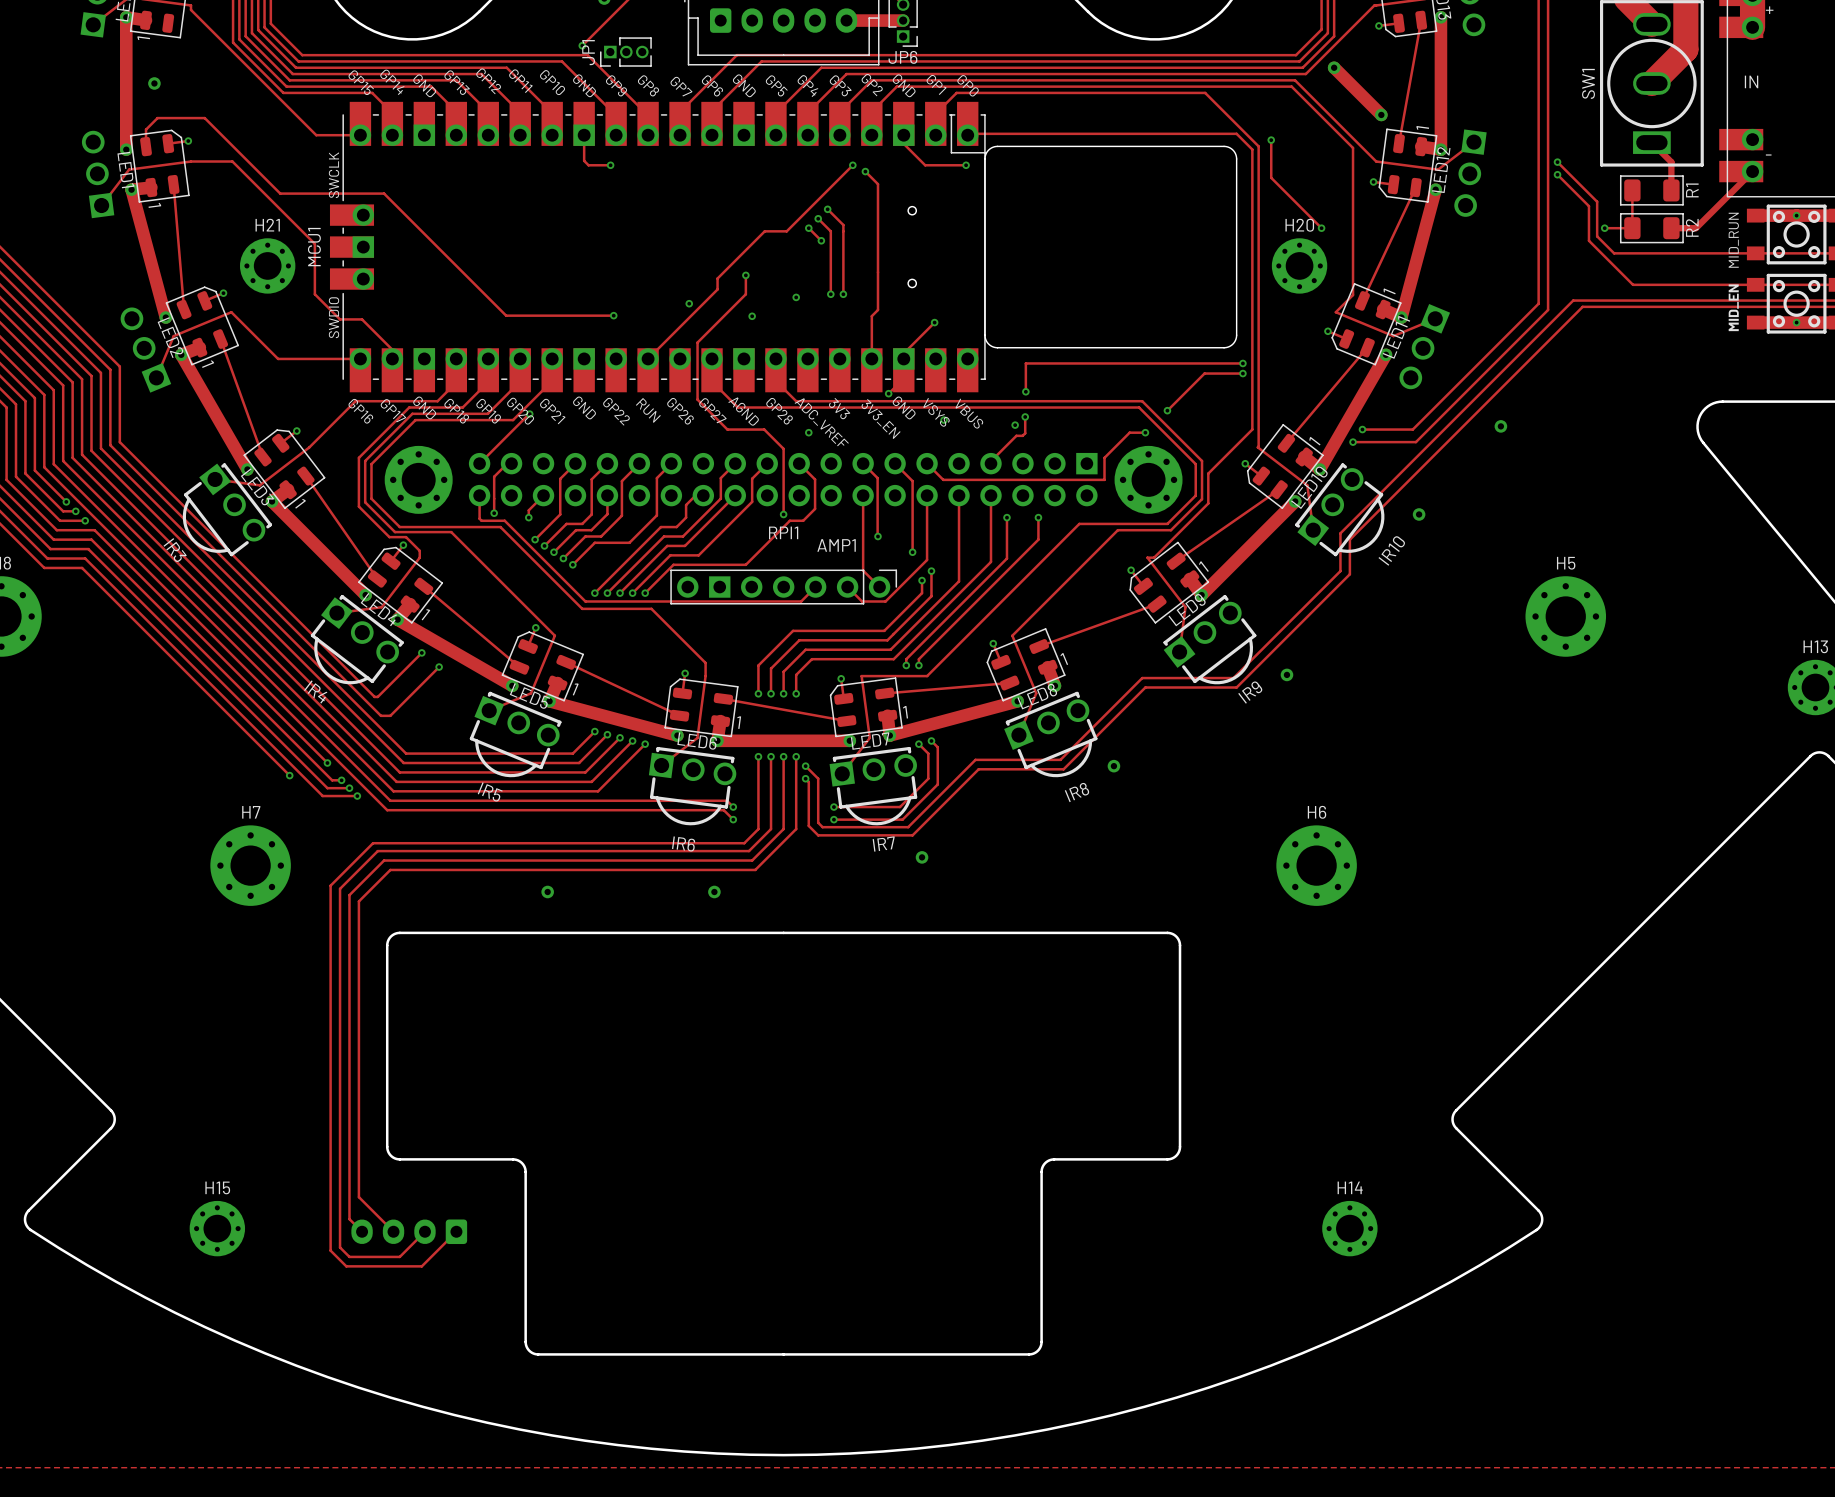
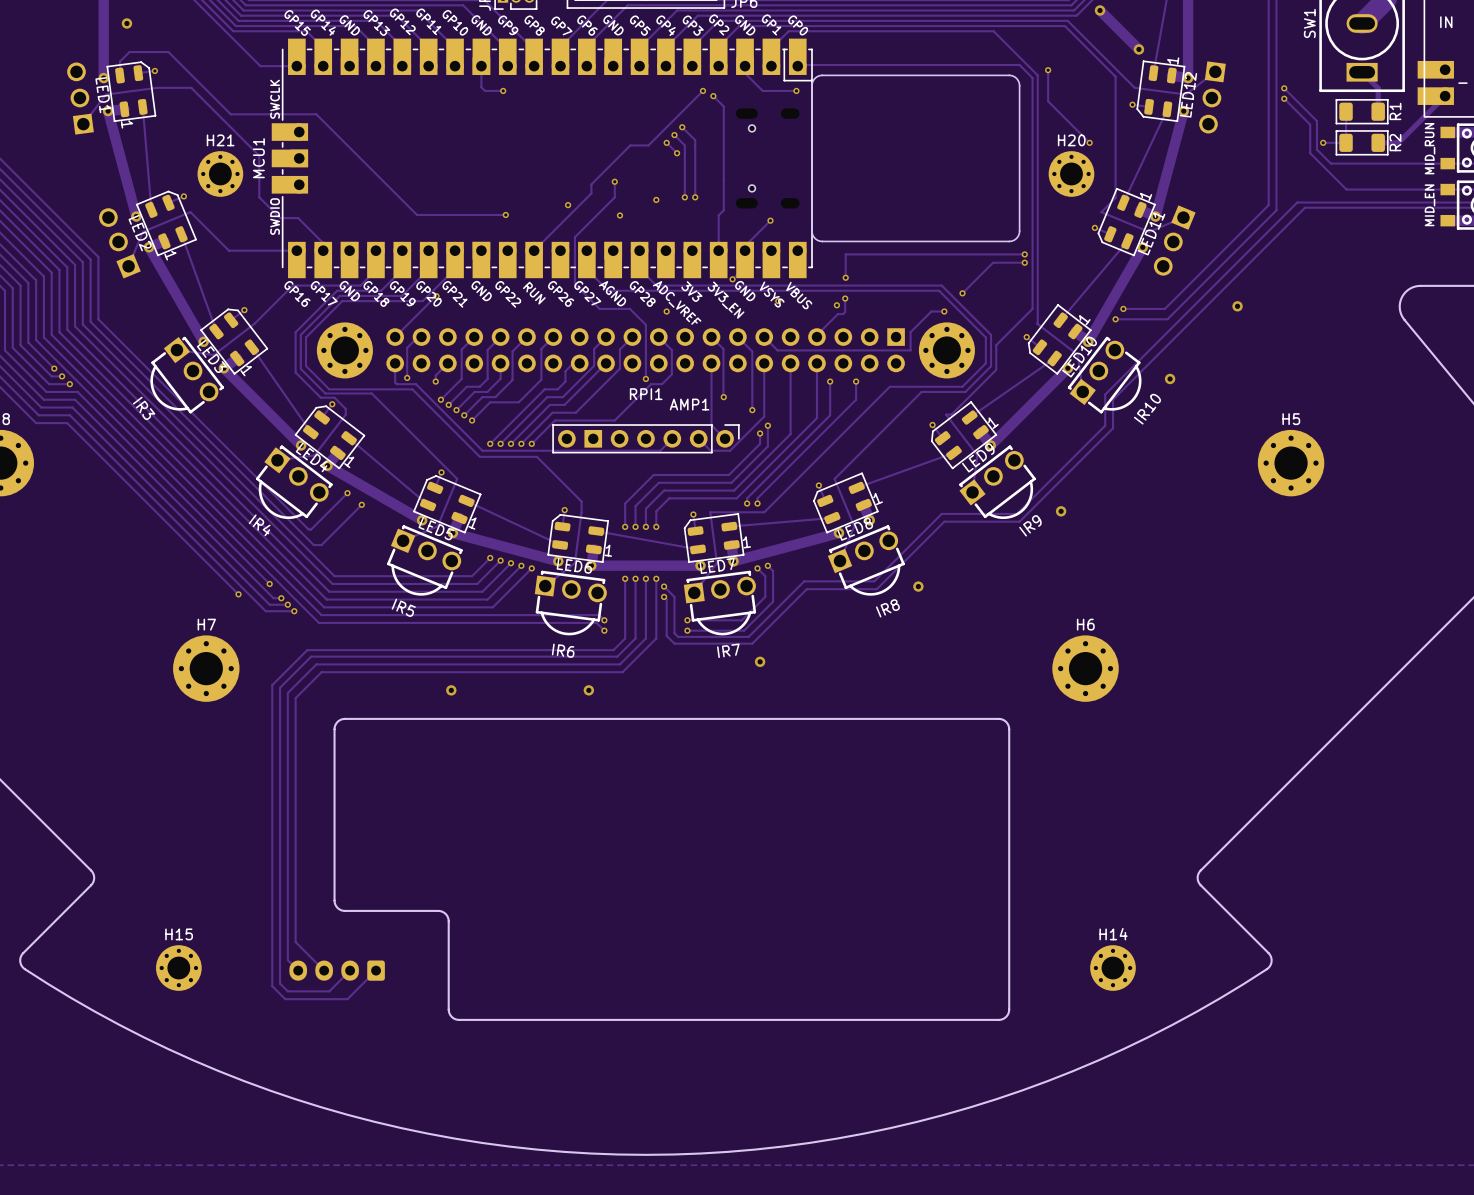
board edge: (418, 1159) (394, 1158) (389, 1154) (387, 1148) (387, 945) (389, 937) (396, 933) (1167, 932) (1175, 935) (1179, 941) (1179, 1150) (1175, 1156) (1168, 1159) (1054, 1159) (1044, 1164) (1041, 1171) (1041, 1343) (1038, 1349) (1033, 1353) (533, 1353) (527, 1348) (525, 1341) (525, 1170) (521, 1163) (513, 1159) -> (344, 910) (337, 907) (334, 900) (334, 729) (336, 722) (342, 719) (998, 718) (1004, 720) (1008, 725) (1009, 1009) (1007, 1015) (1002, 1019) (457, 1019) (451, 1016) (448, 1010) (448, 918) (441, 911) (422, 910)

